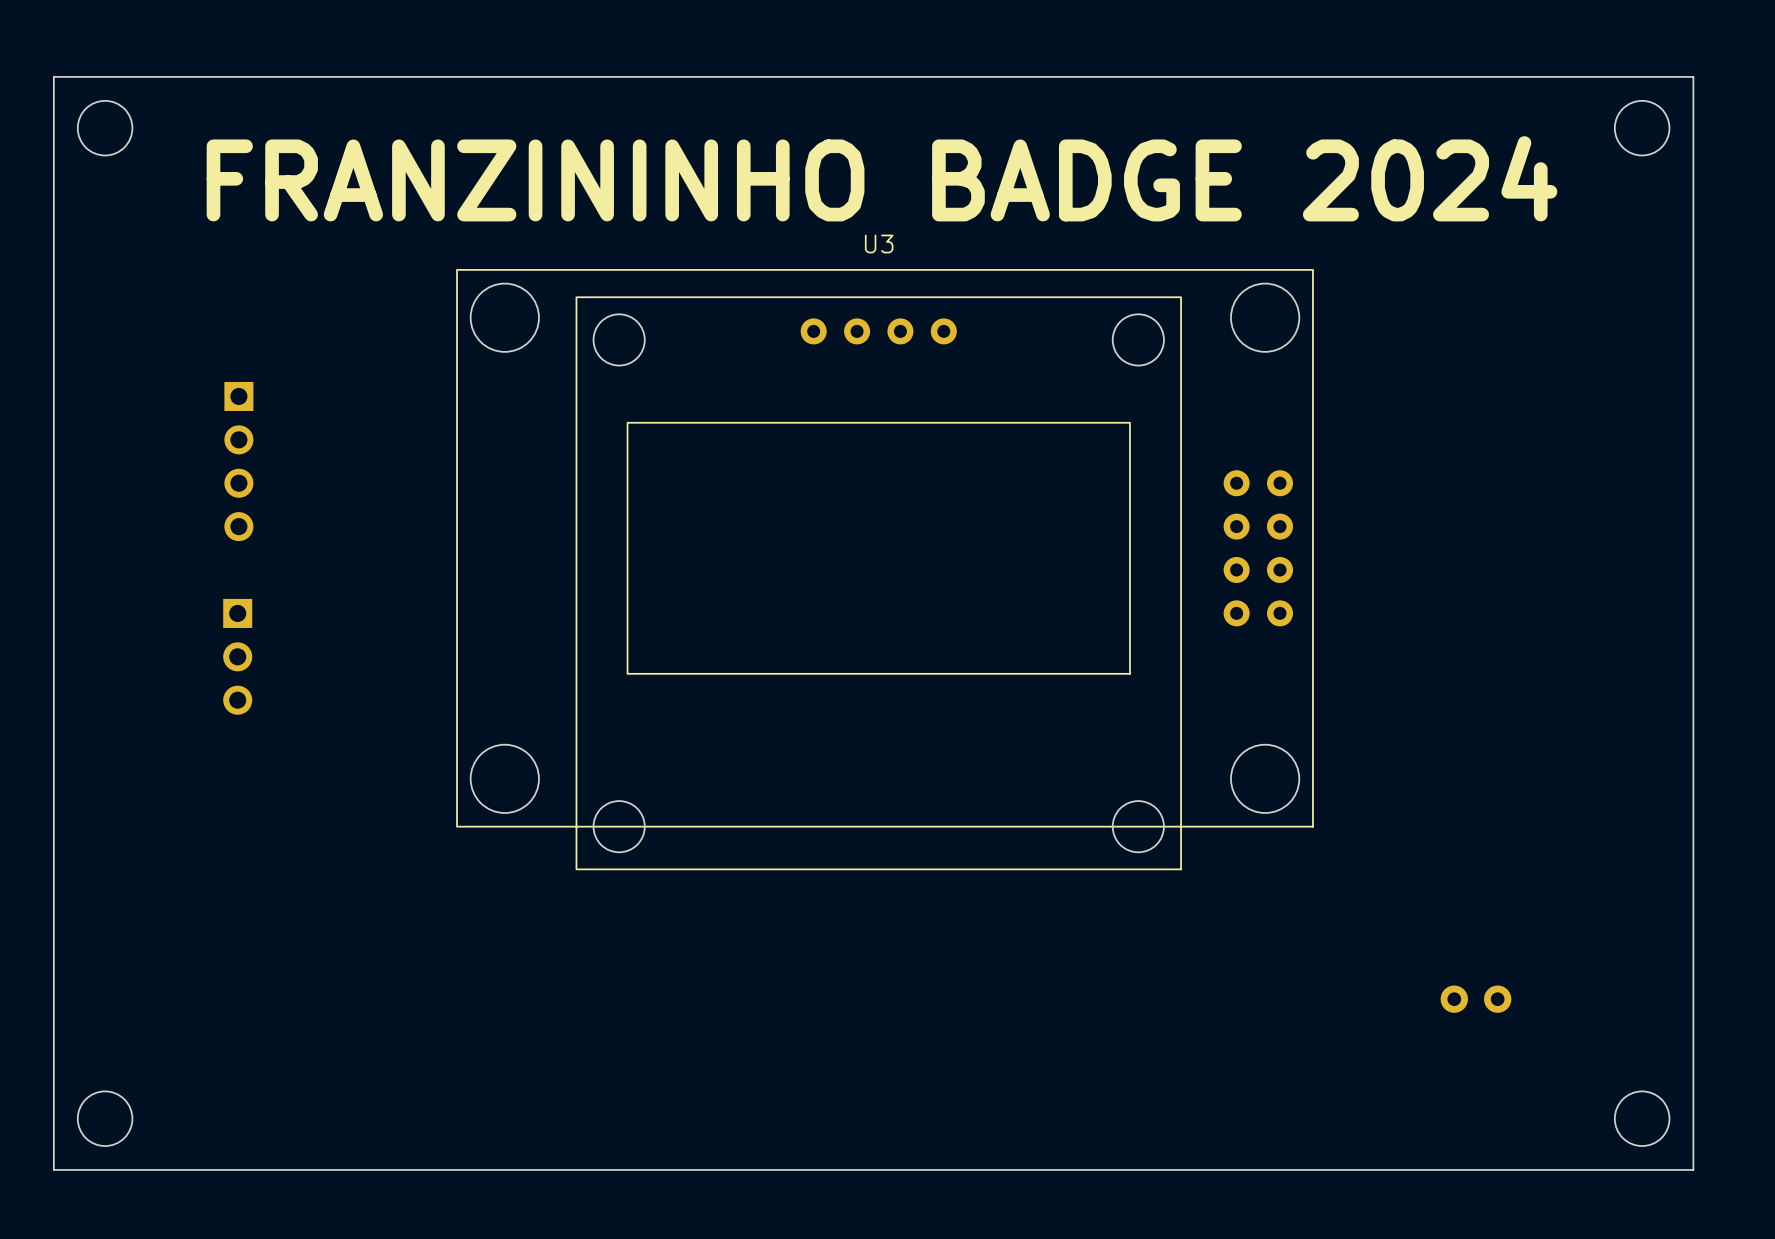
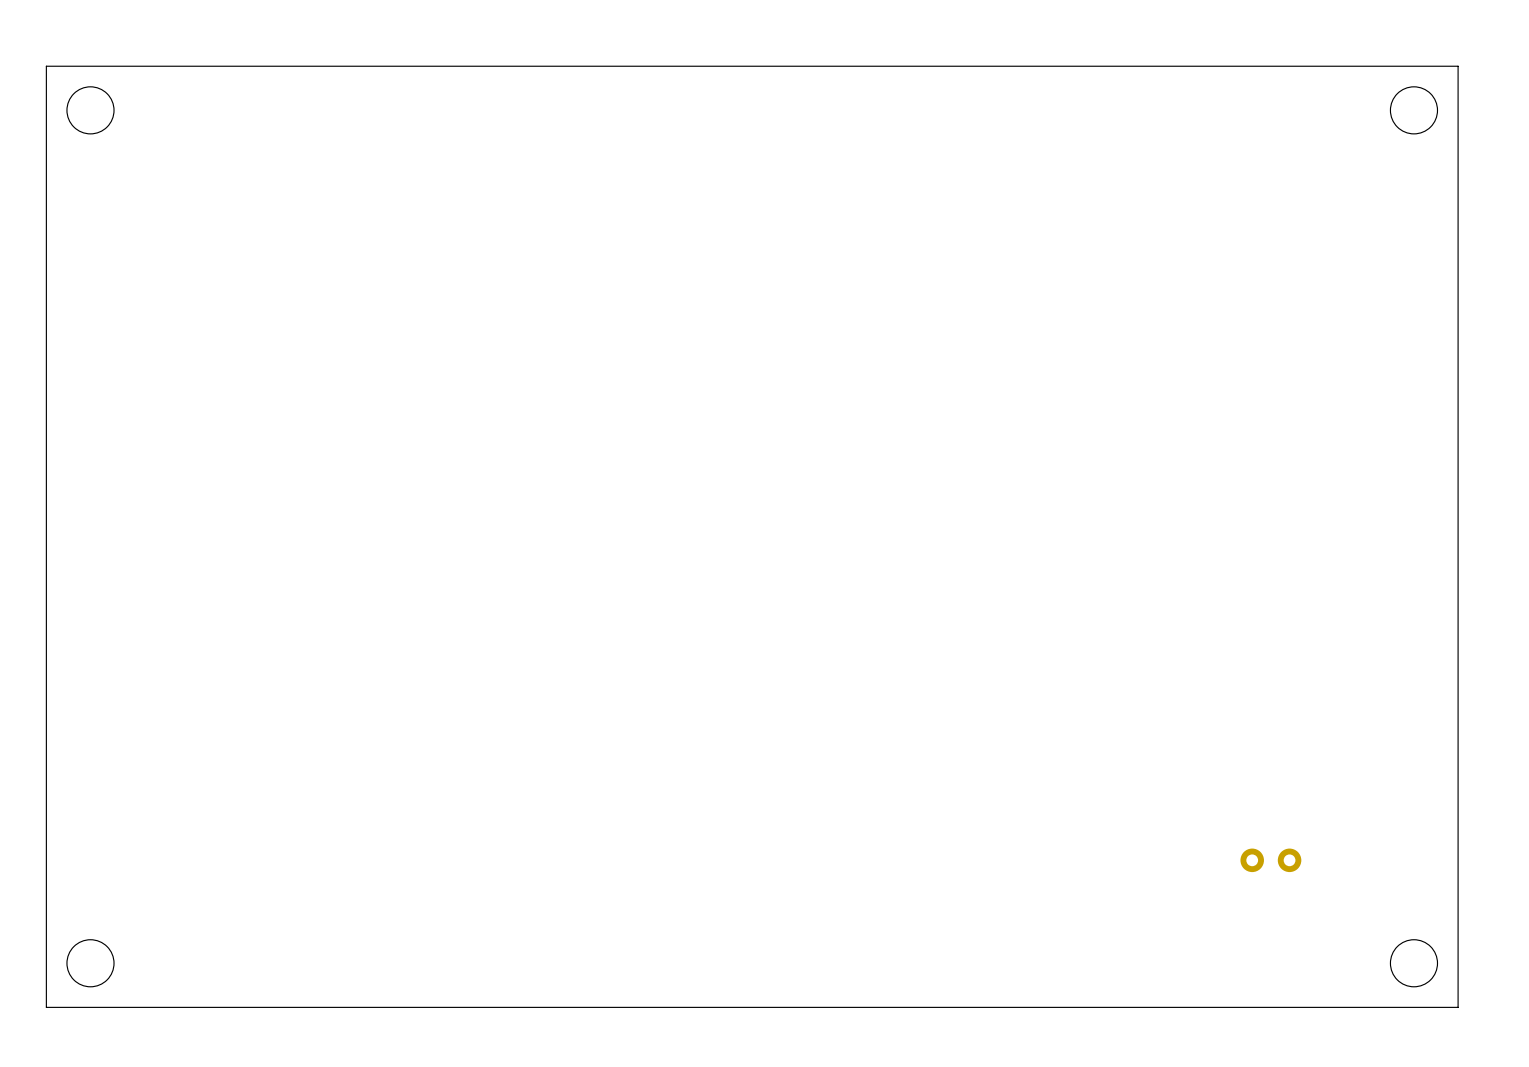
text: FRANZININHO BADGE 2024 (882, 178) -> none
part: (238, 461) -> none
U3: (884, 548) -> none
part: (878, 583) -> none
part: (237, 656) -> none

